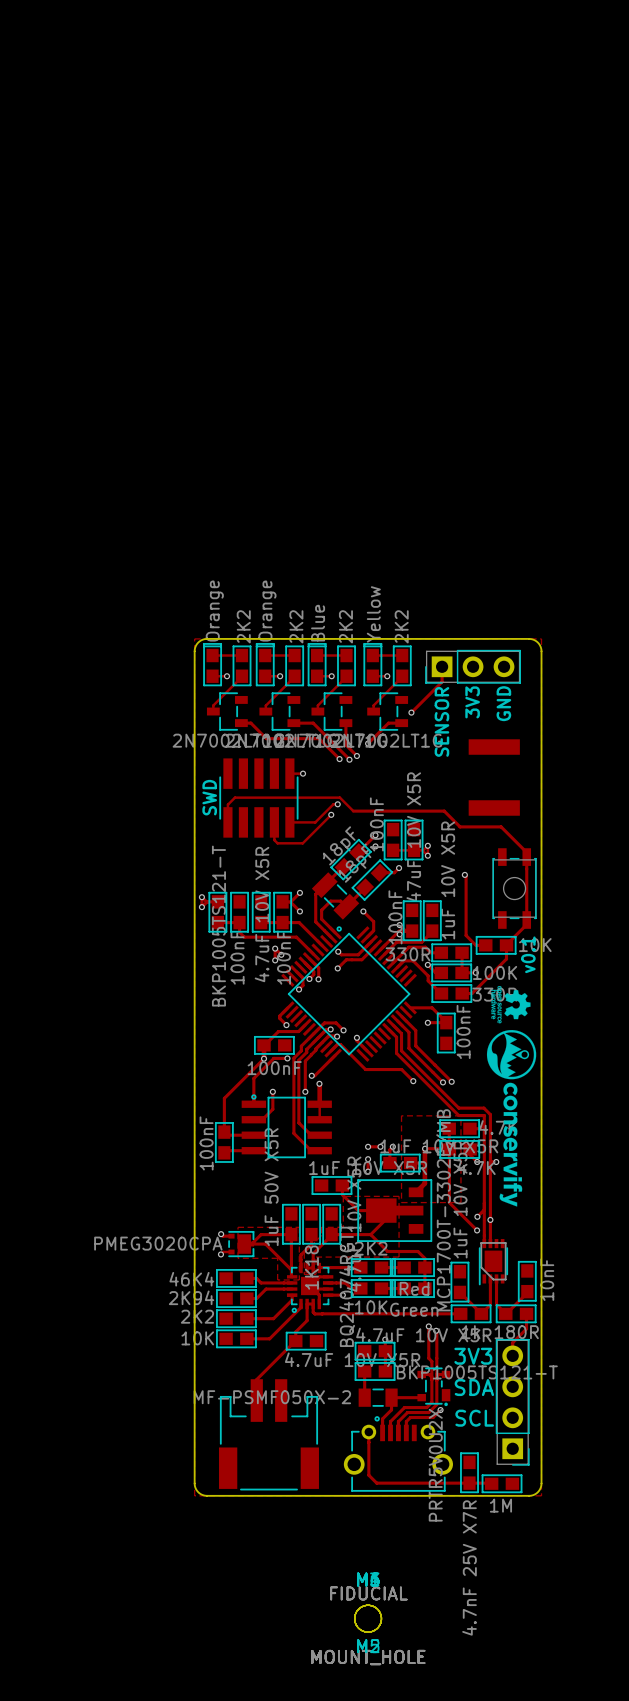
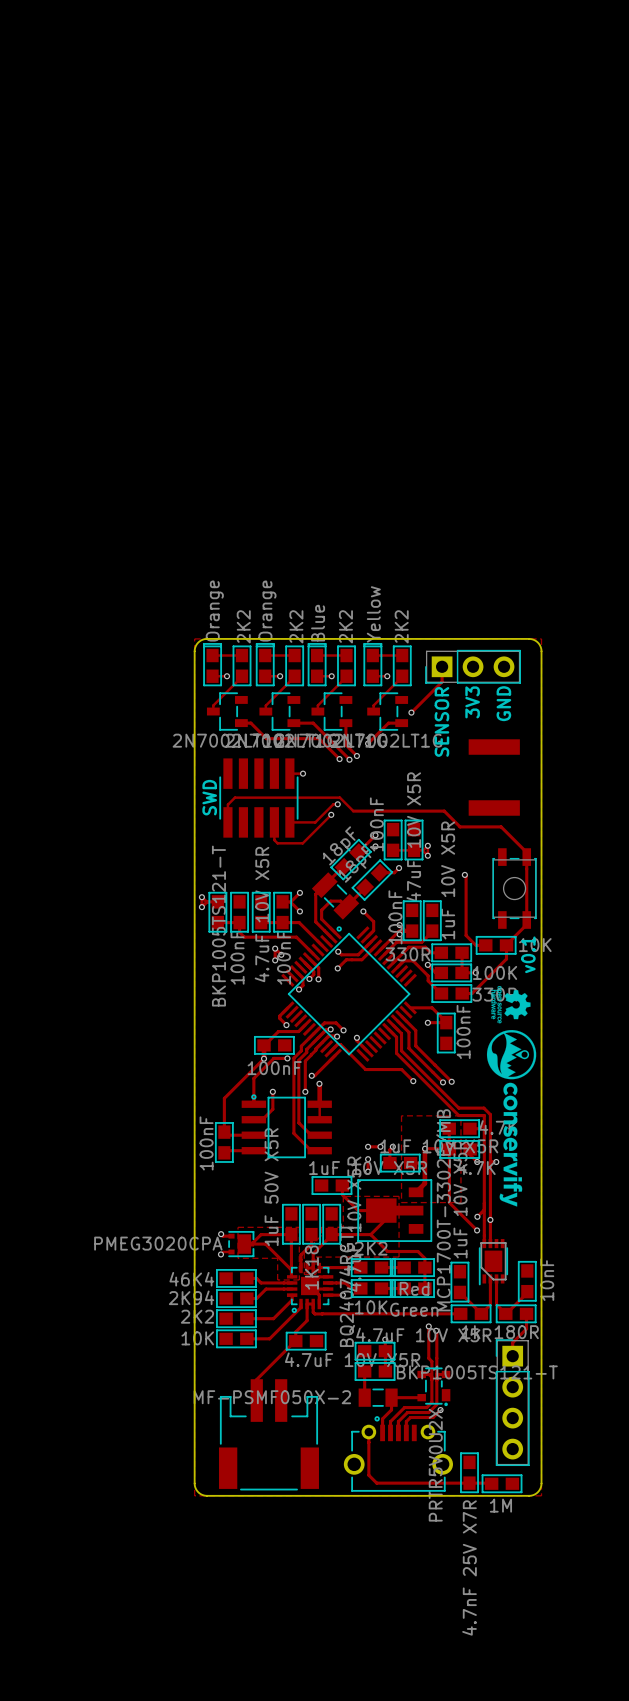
text: 3V3 (473, 1356) -> none
text: SDA (474, 1387) -> none
part rotation: 0° (512, 1402) -> 180° (512, 1402)
text: SCL (474, 1418) -> none
part: MOUNT_HOLE (368, 1618) -> none
part: FIDUCIAL (368, 1618) -> none
part: MOUNT_HOLE (368, 1618) -> none
part: MOUNT_HOLE (368, 1618) -> none
part: FIDUCIAL (368, 1618) -> none
part: MOUNT_HOLE (368, 1618) -> none

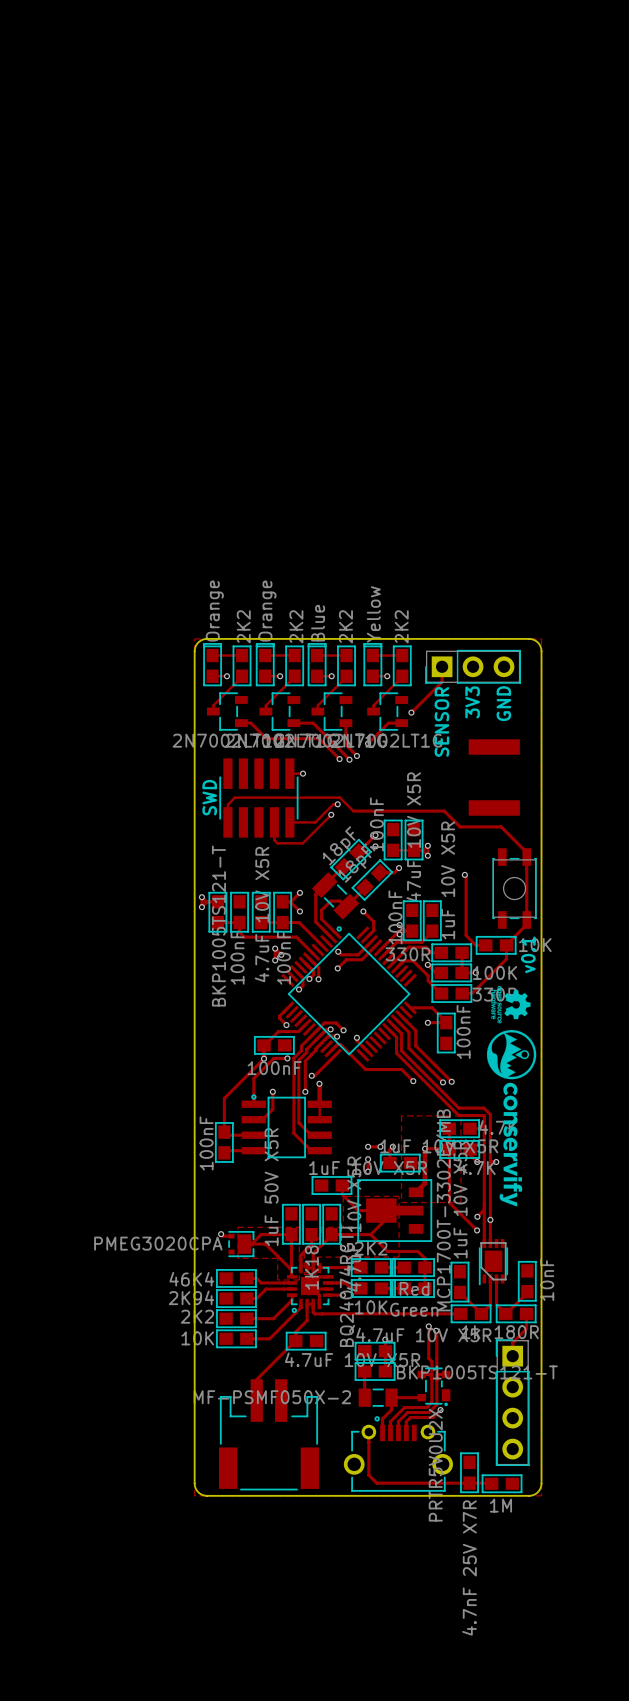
track: (231, 1251) (223, 1251) (220, 1254) -> none
via: (220, 1254) -> none

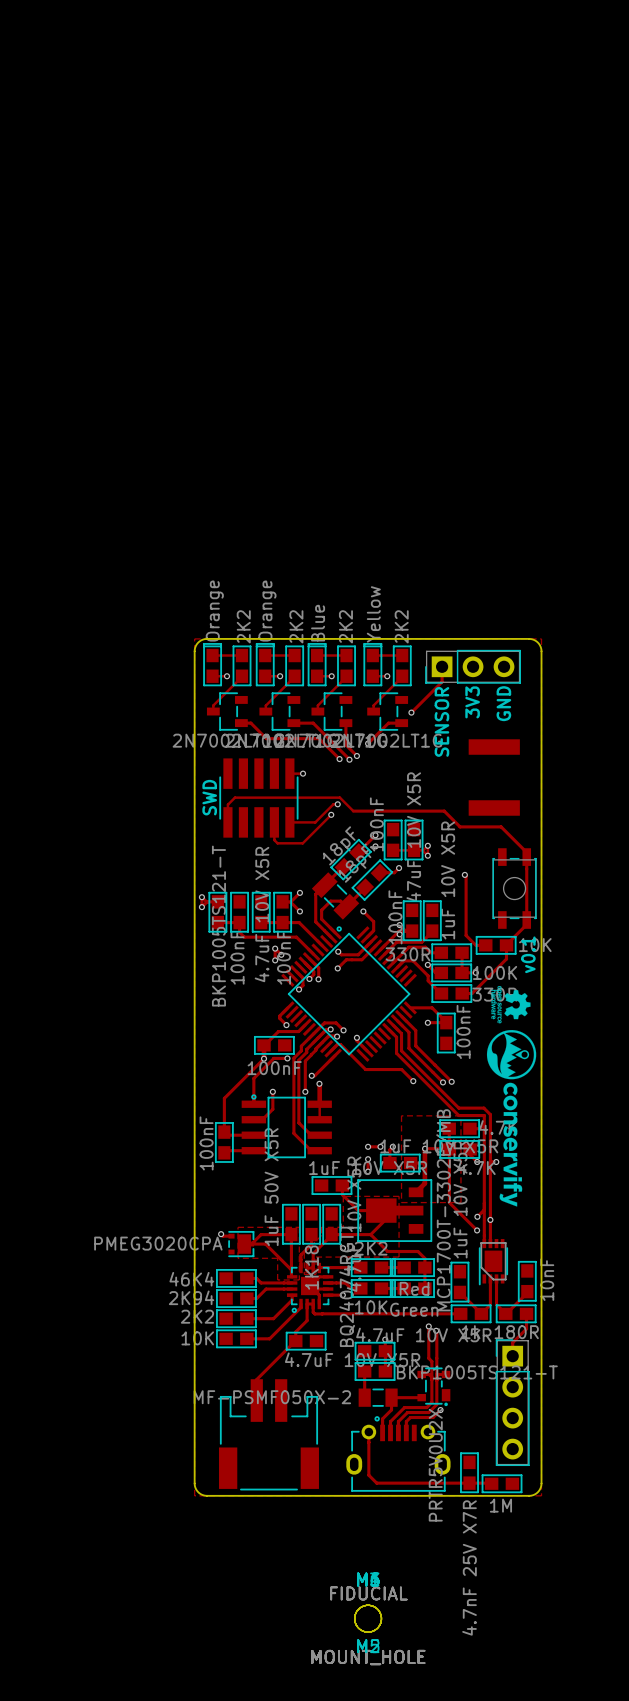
part footprint: [343, 1416, 453, 1492] -> [346, 1416, 451, 1492]
part: none -> MOUNT_HOLE (368, 1618)
part: none -> FIDUCIAL (368, 1618)
part: none -> MOUNT_HOLE (368, 1618)
part: none -> MOUNT_HOLE (368, 1618)
part: none -> FIDUCIAL (368, 1618)
part: none -> MOUNT_HOLE (368, 1618)

